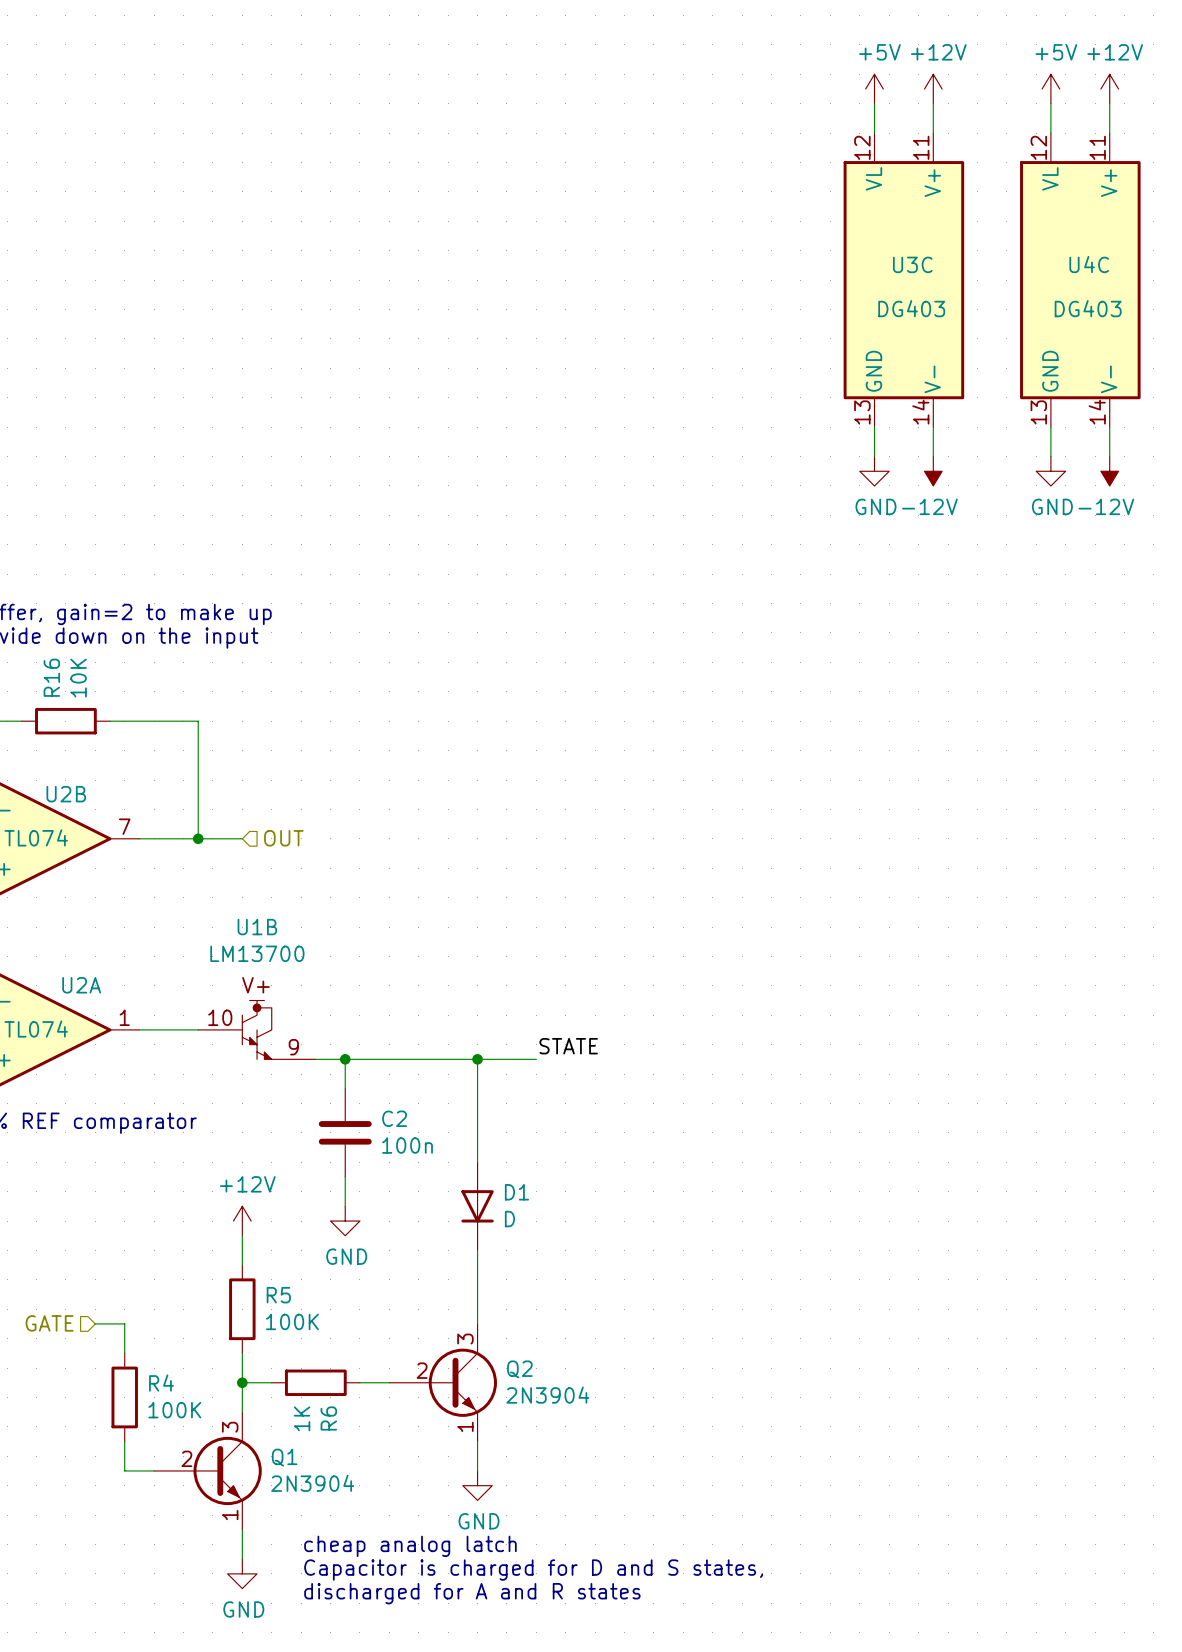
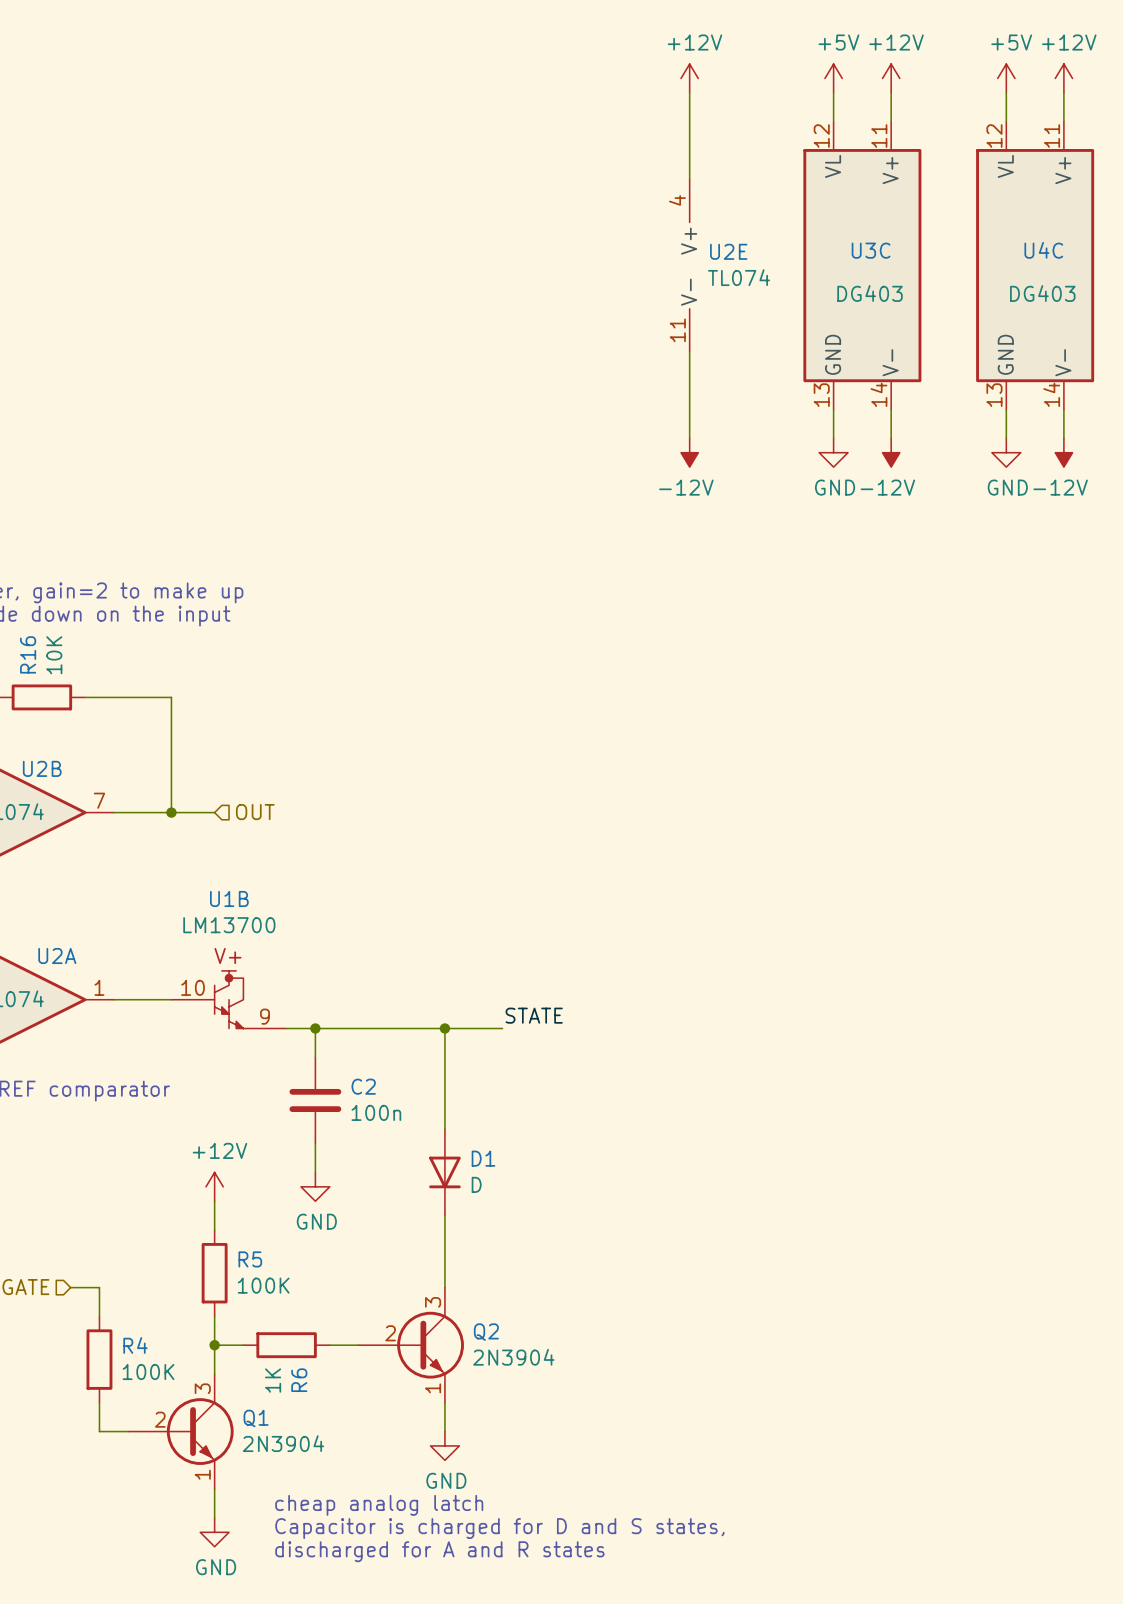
power symbol: none -> +12V (689, 78)
wire: none -> (689, 92) (689, 179)
U2E: none -> TL074 (689, 265)
wire: none -> (689, 351) (689, 438)
power symbol: none -> -12V (689, 452)

